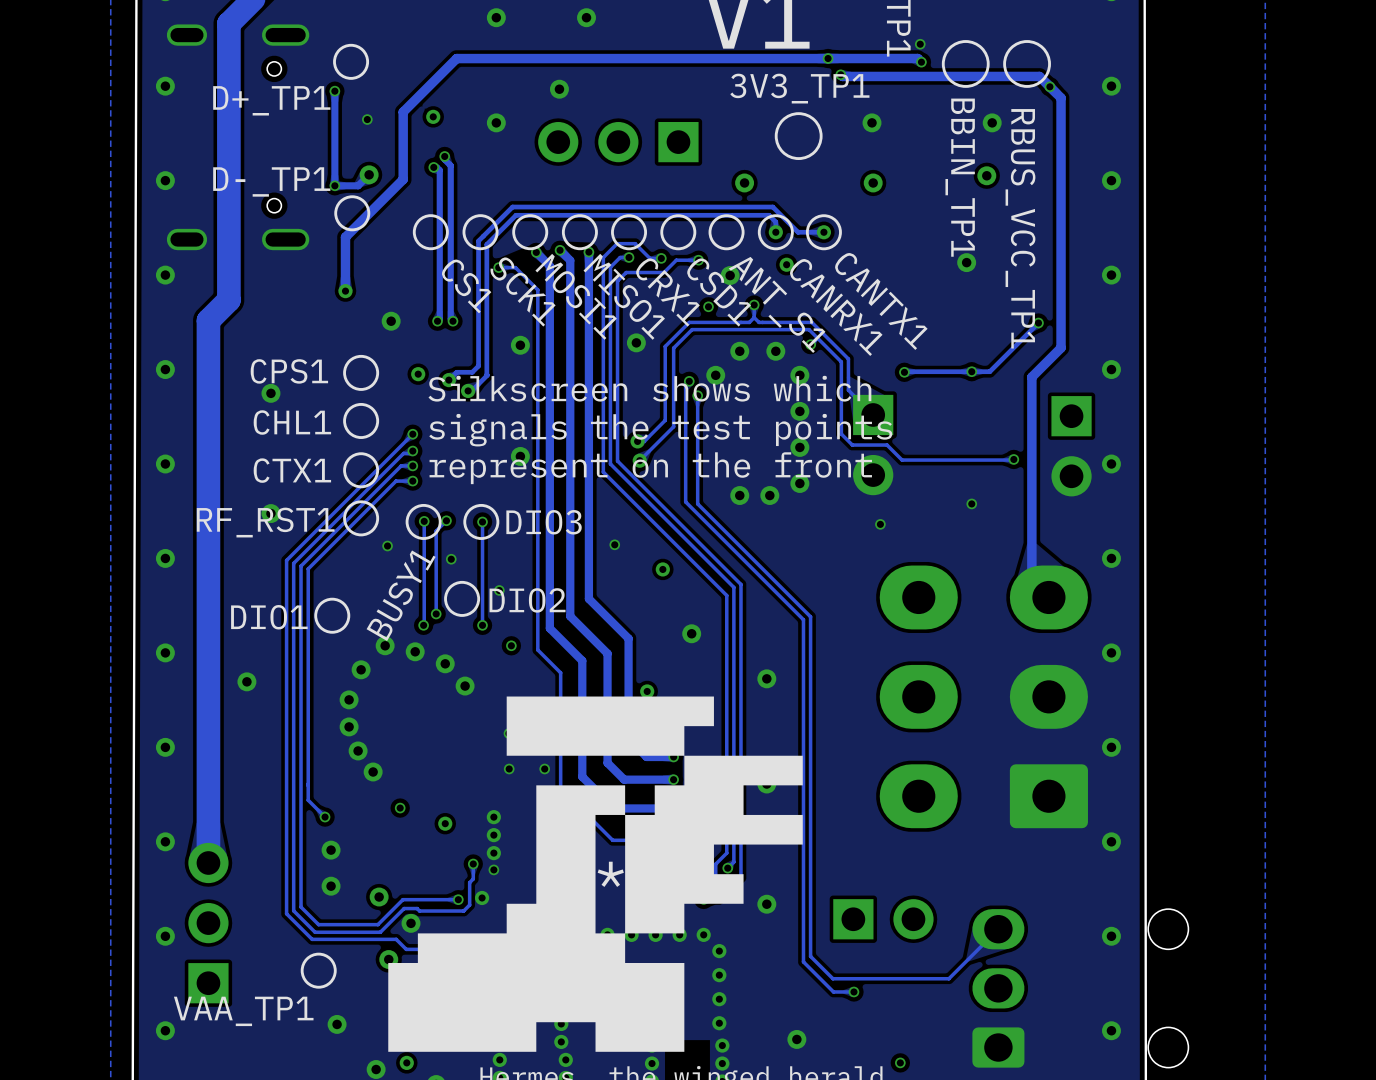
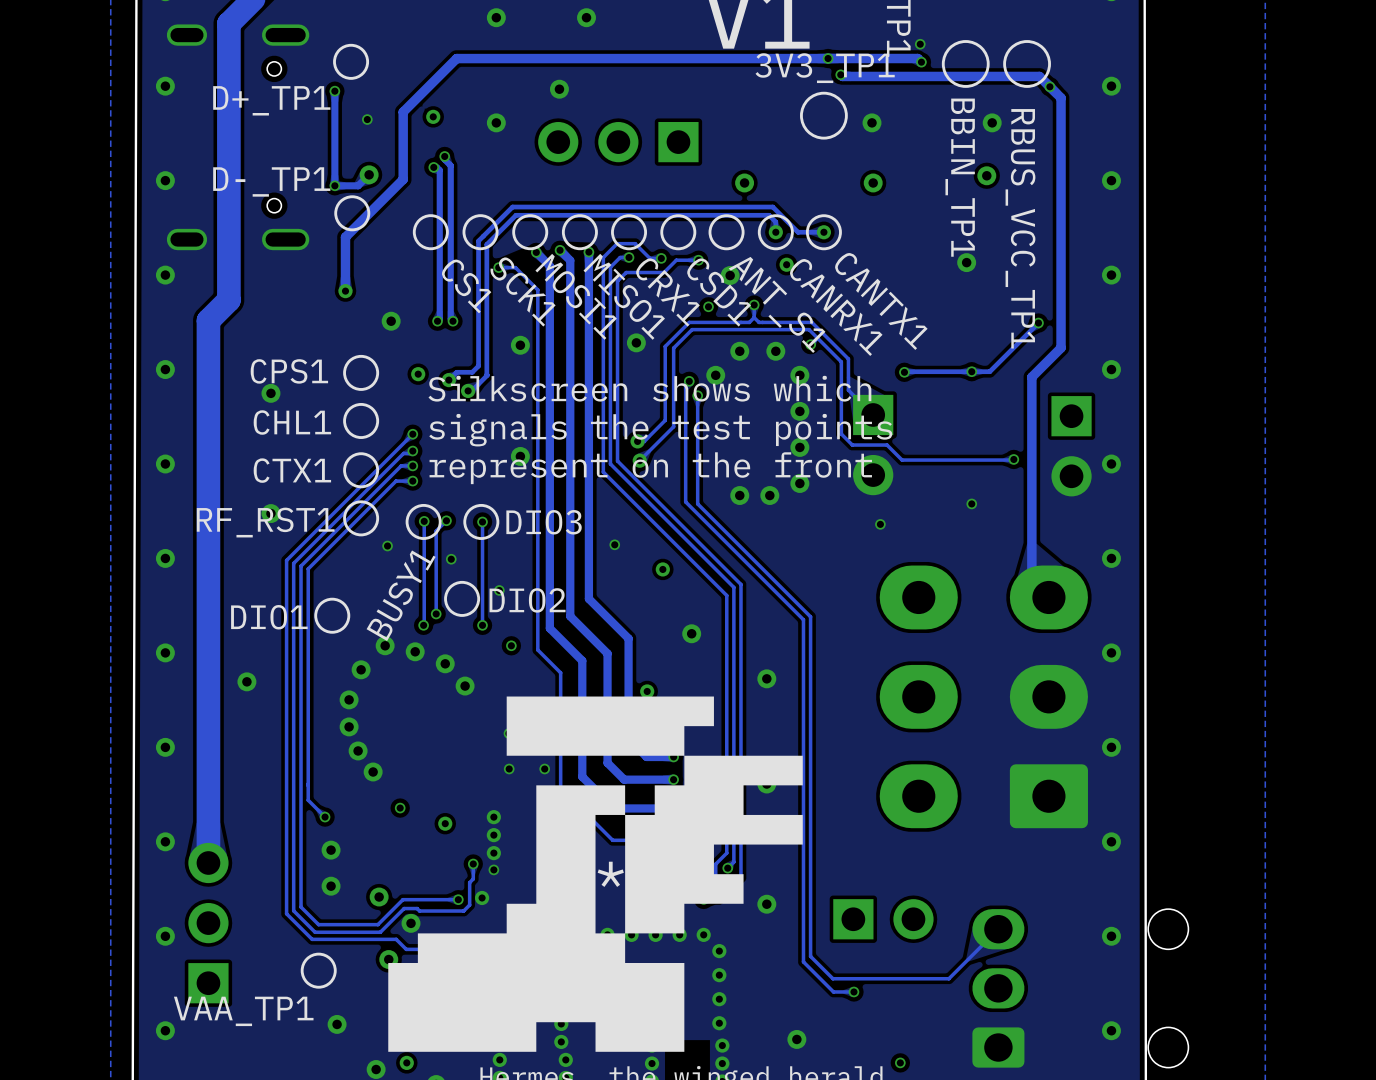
3V3_TP1 position: (798, 136) -> (823, 115)

